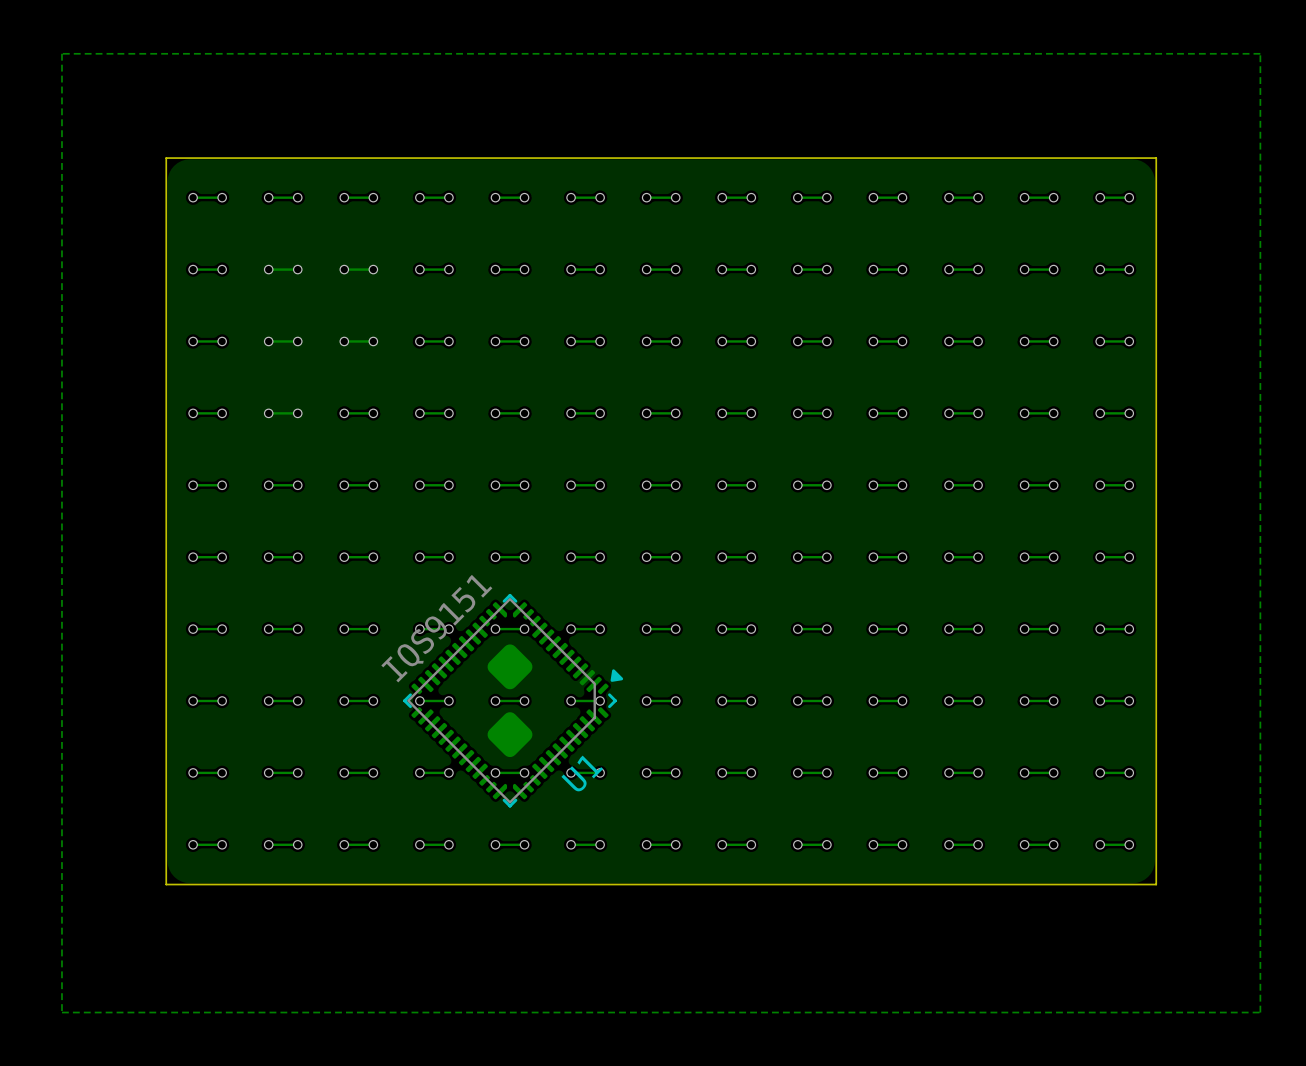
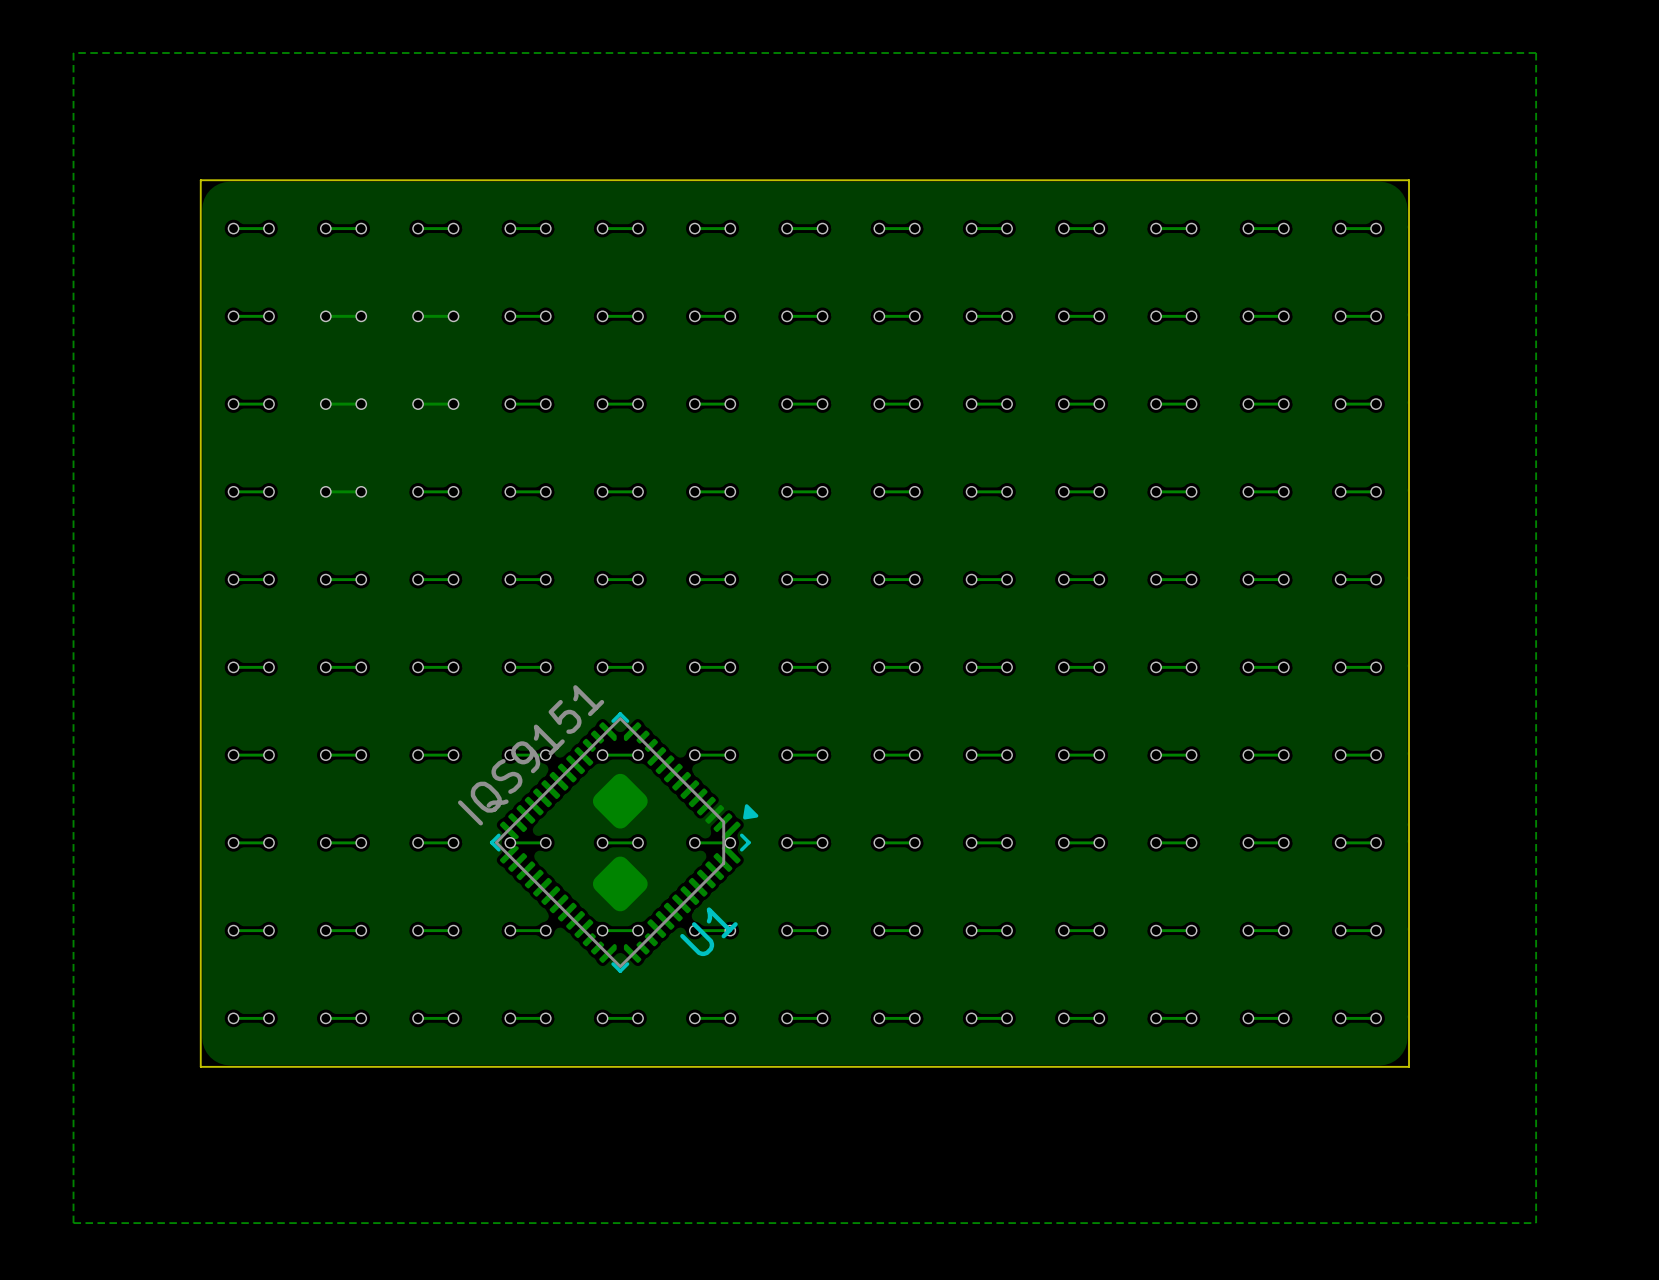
U1 footprint: [403, 593, 624, 808] -> [489, 712, 759, 973]

